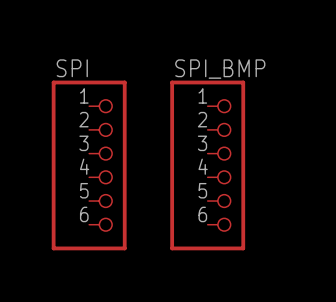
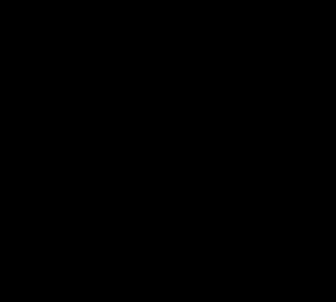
SPI: (89, 165) -> none
SPI_BMP: (207, 165) -> none

